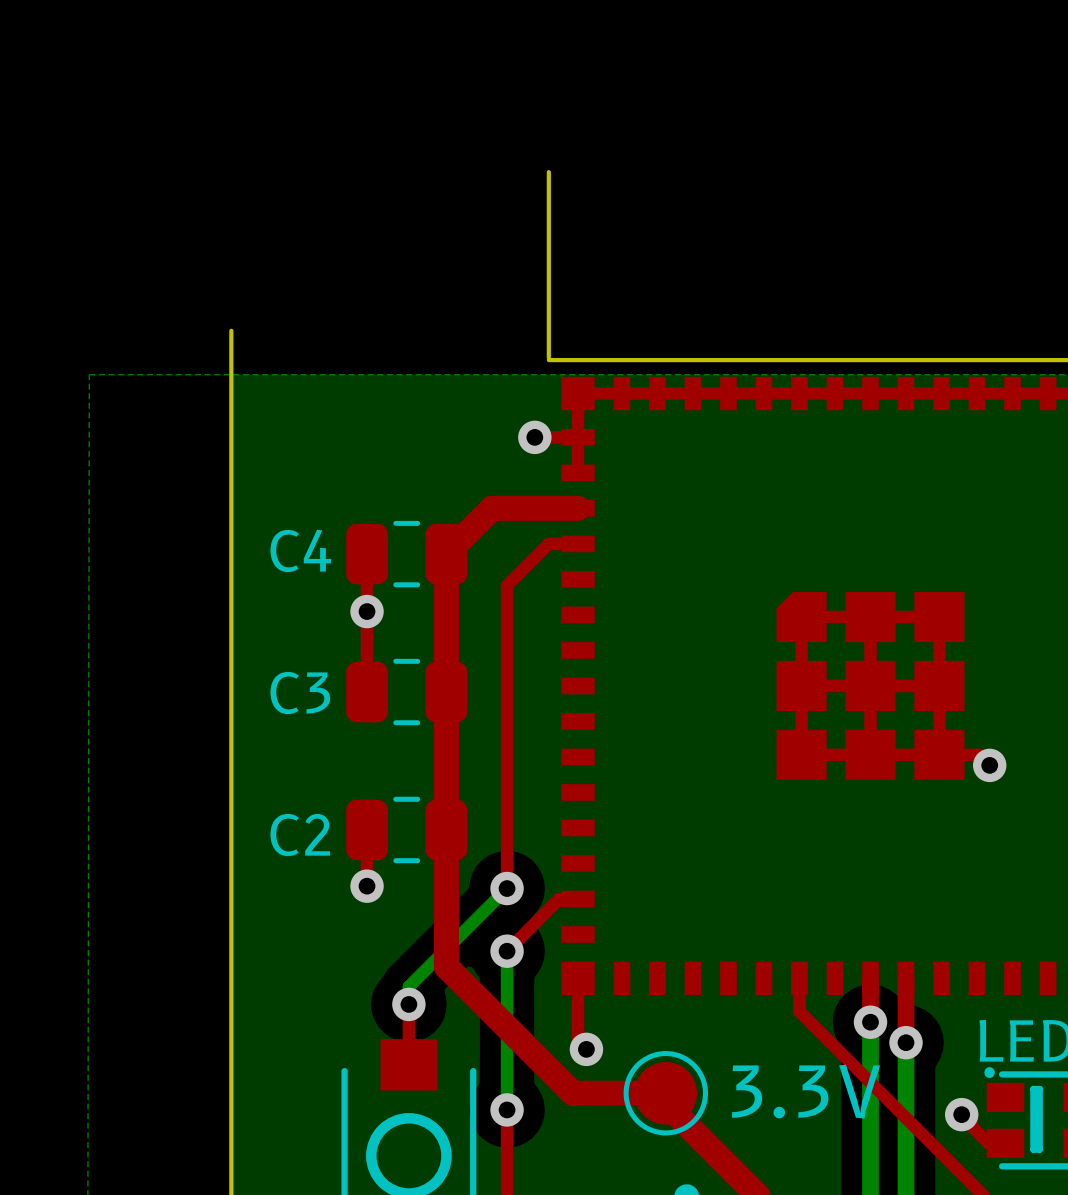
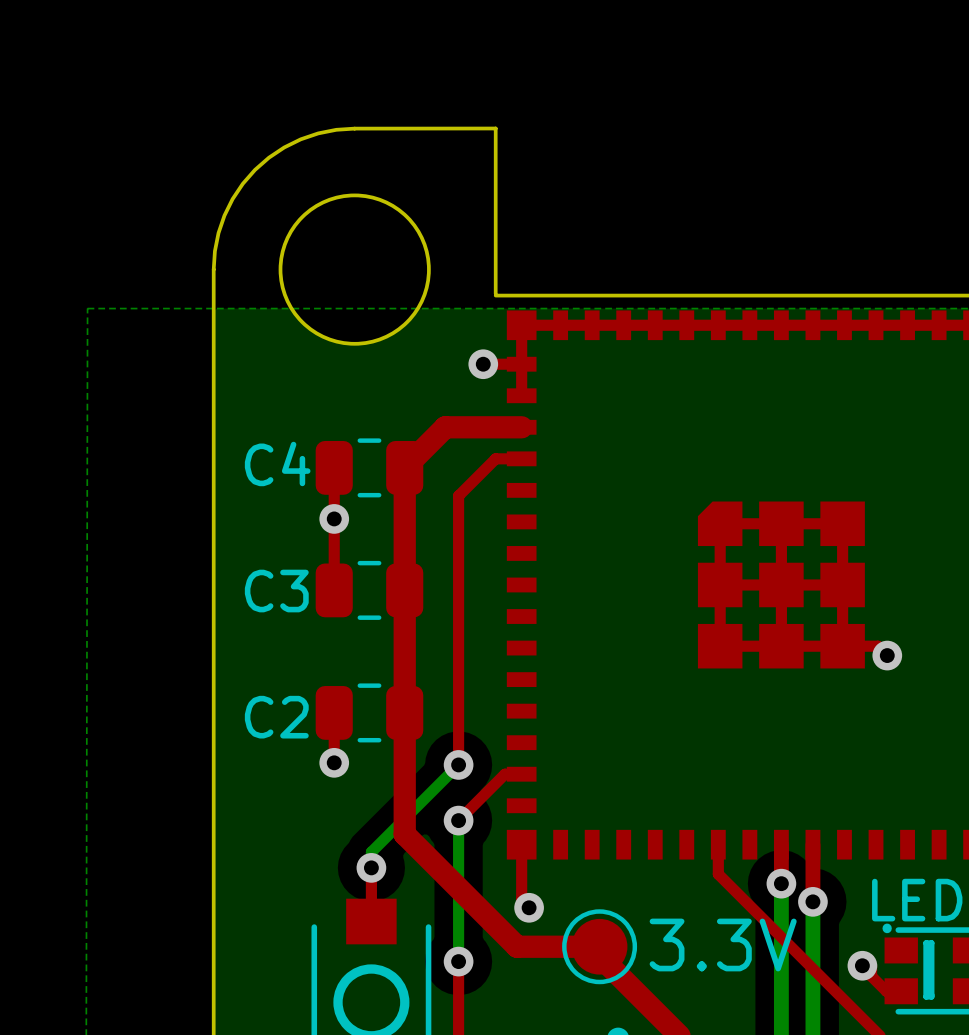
board edge: none -> (495, 128) (336, 129) (300, 139) (284, 147) (255, 169) (232, 199) (218, 233) (213, 269)
round board edge: none -> [278, 193, 431, 346]

